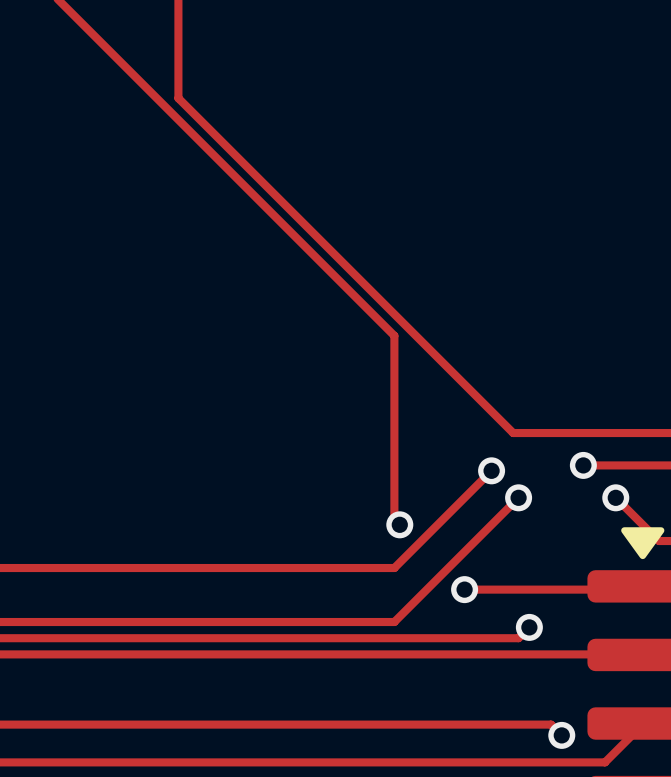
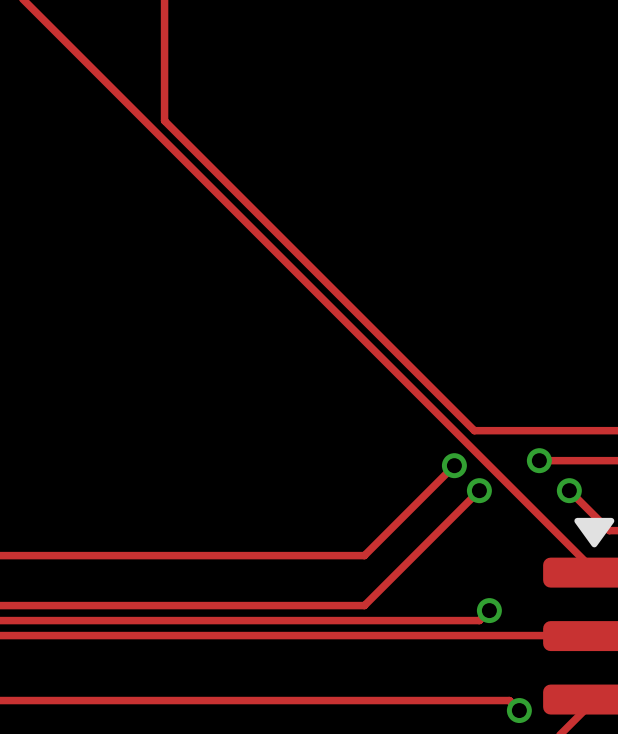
track: (394, 335) (394, 519) (399, 524) -> (364, 340) (594, 572)
via: (399, 524) -> none
track: (464, 589) (637, 589) -> none
via: (464, 589) -> none

